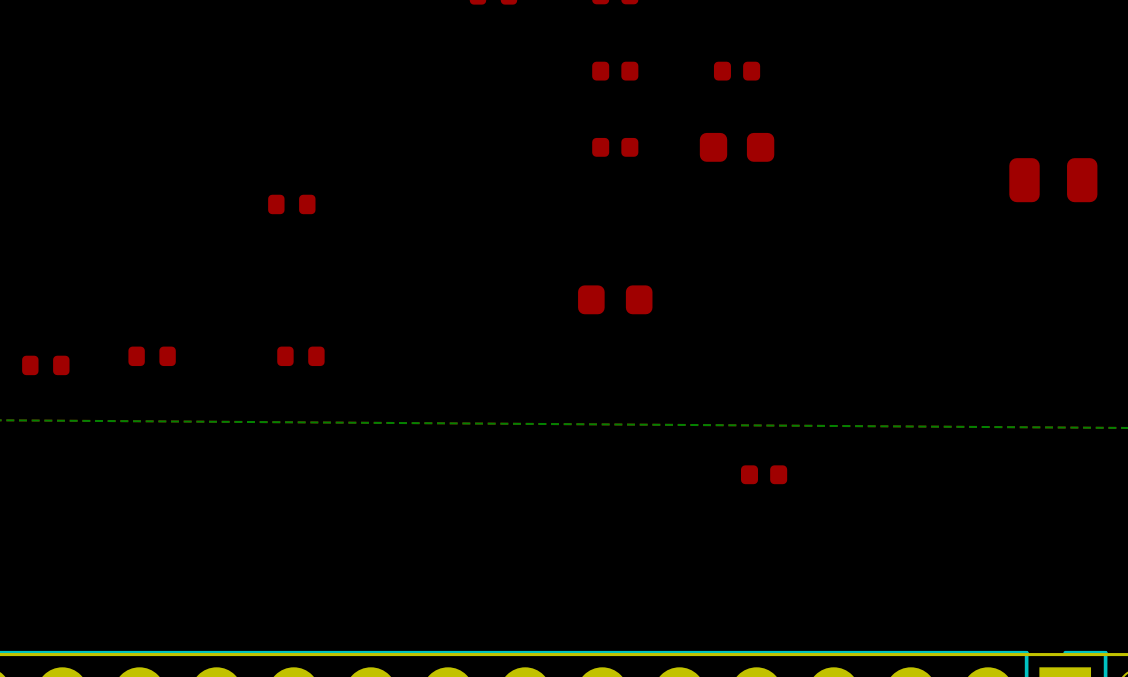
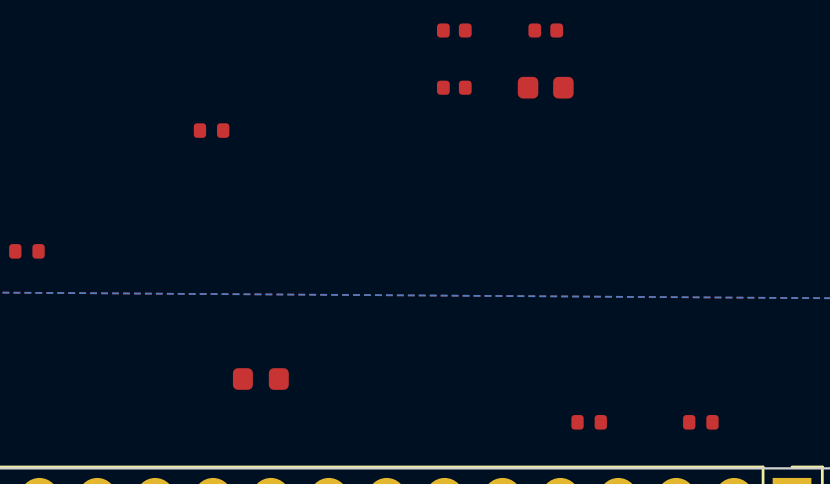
part: (1053, 180) -> none
part position: (615, 299) -> (260, 379)
part: (152, 356) -> none
part: (300, 356) -> none
part: (764, 474) -> none
part: none -> (589, 422)
part: none -> (700, 422)

